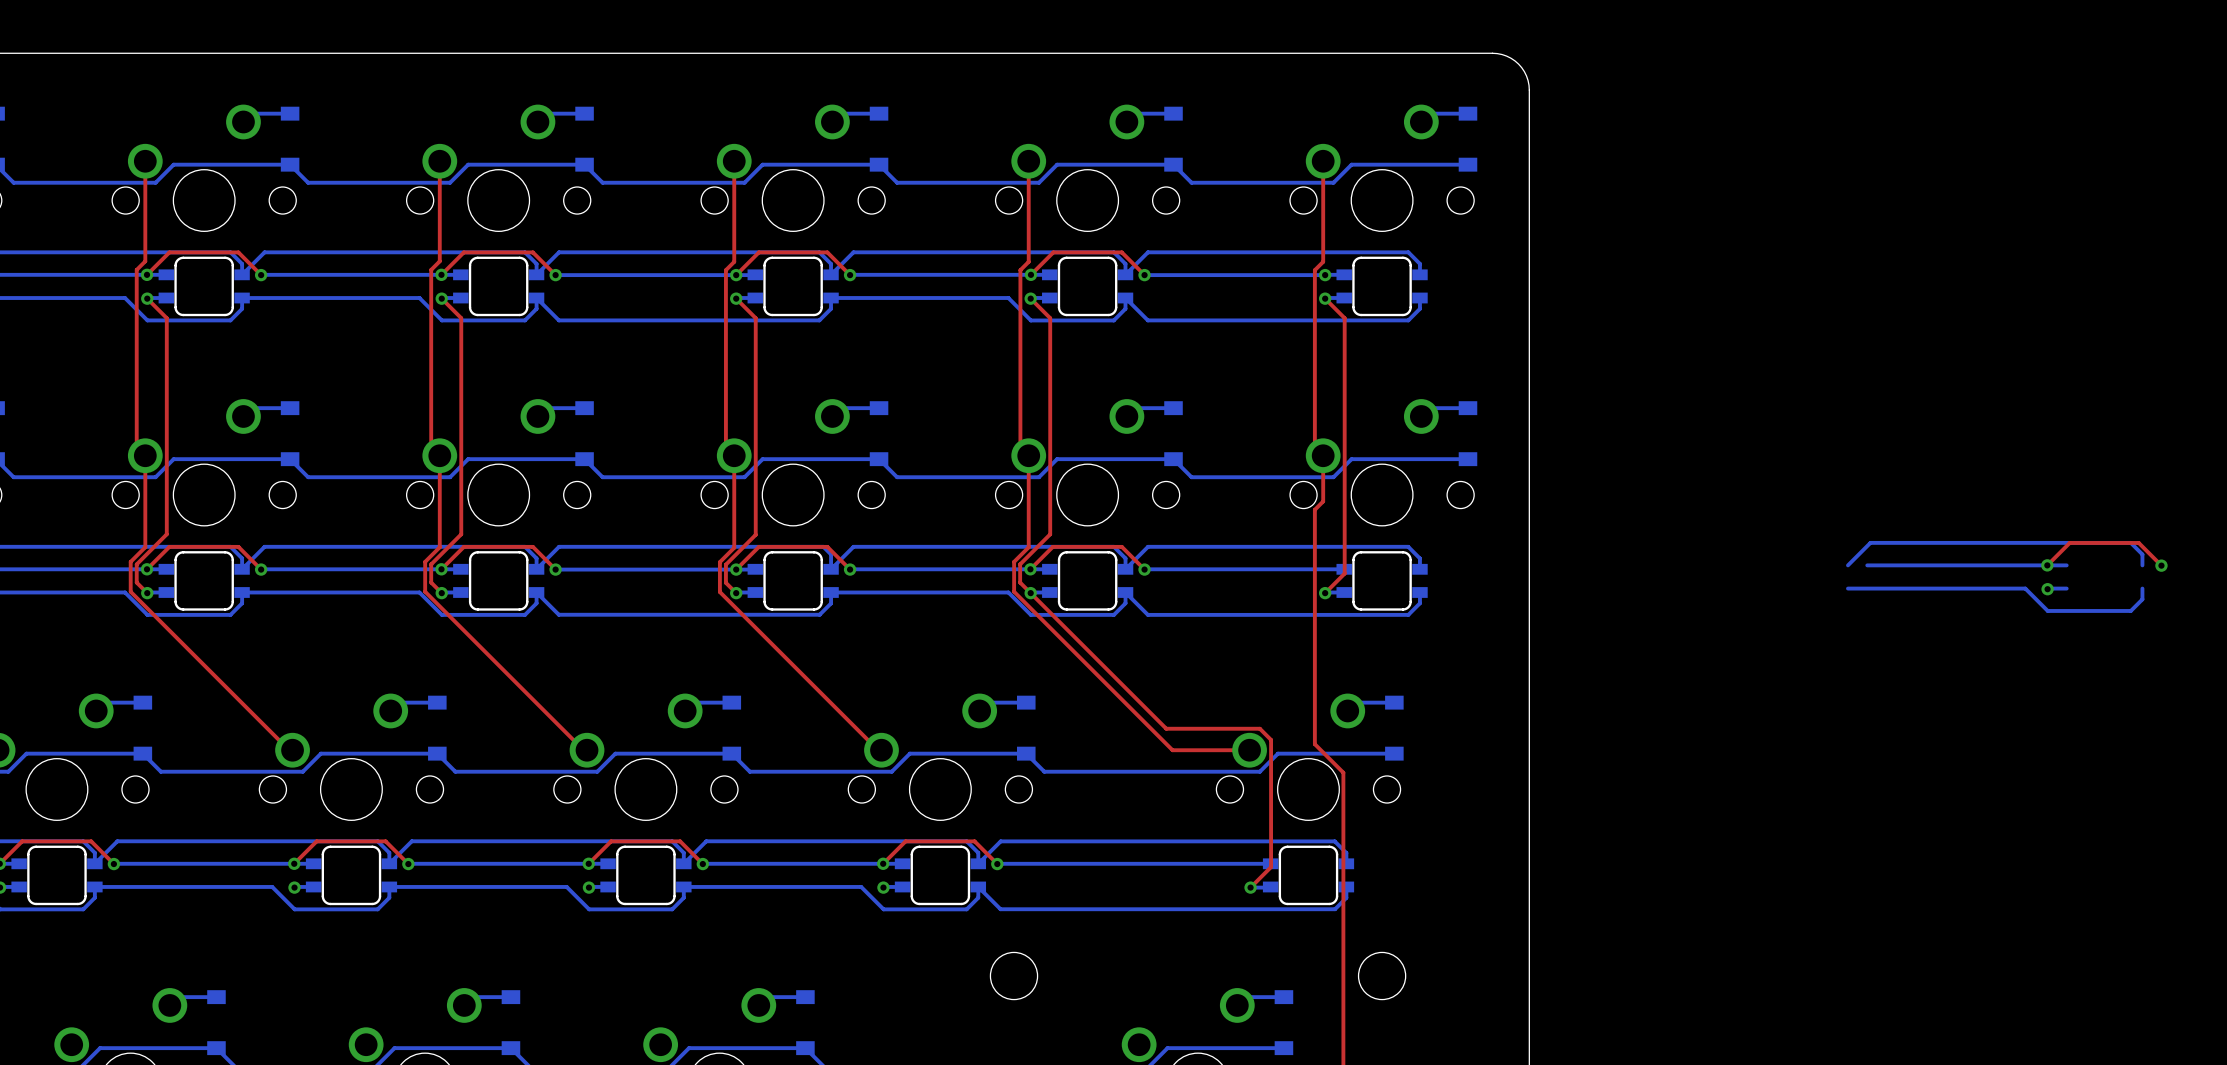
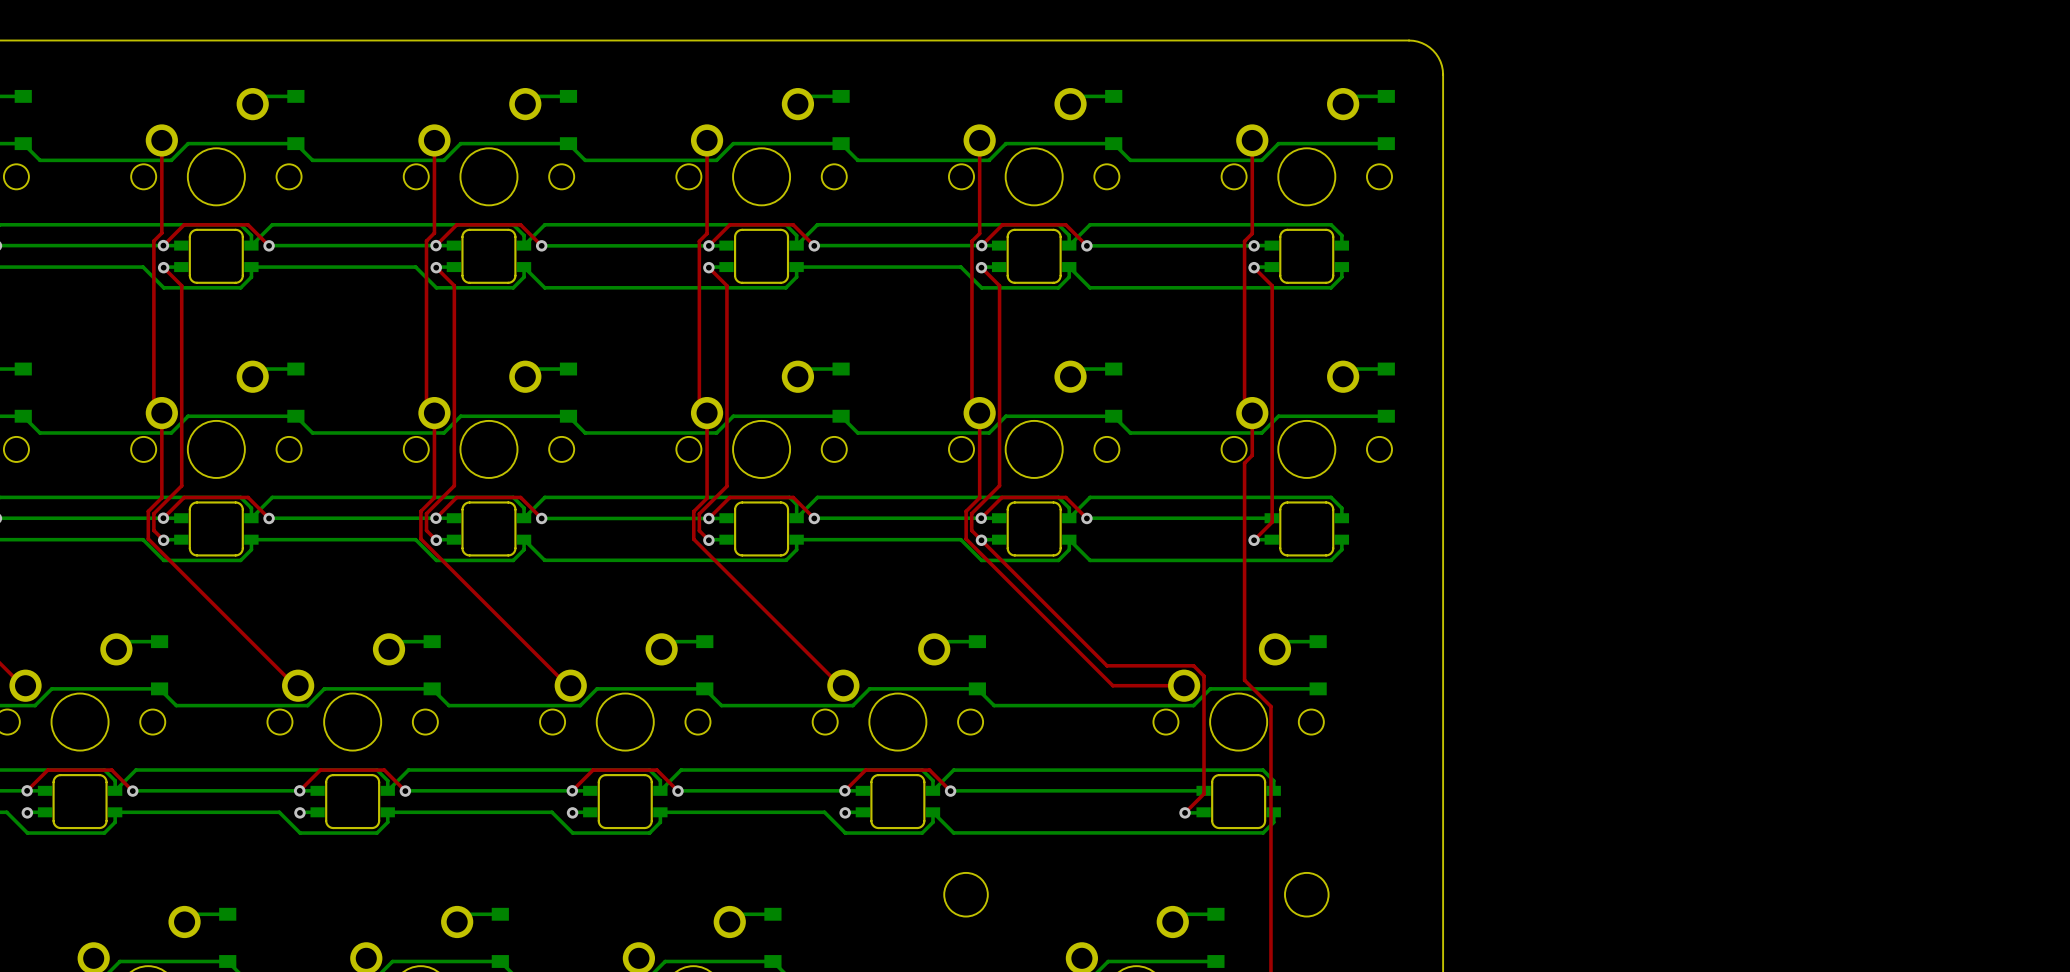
bottom track: (1847, 565) (1870, 542) (2130, 542) (2142, 554) (2142, 565) -> none
bottom track: (1867, 565) (2066, 565) -> none
top track: (2047, 565) (2069, 542) (2138, 542) (2161, 565) -> none
via: (2047, 565) -> none
via: (2161, 565) -> none
bottom track: (1847, 588) (2025, 588) (2047, 610) (2130, 610) (2142, 599) (2142, 588) -> none
bottom track: (2048, 588) (2066, 588) -> none
via: (2047, 589) -> none

